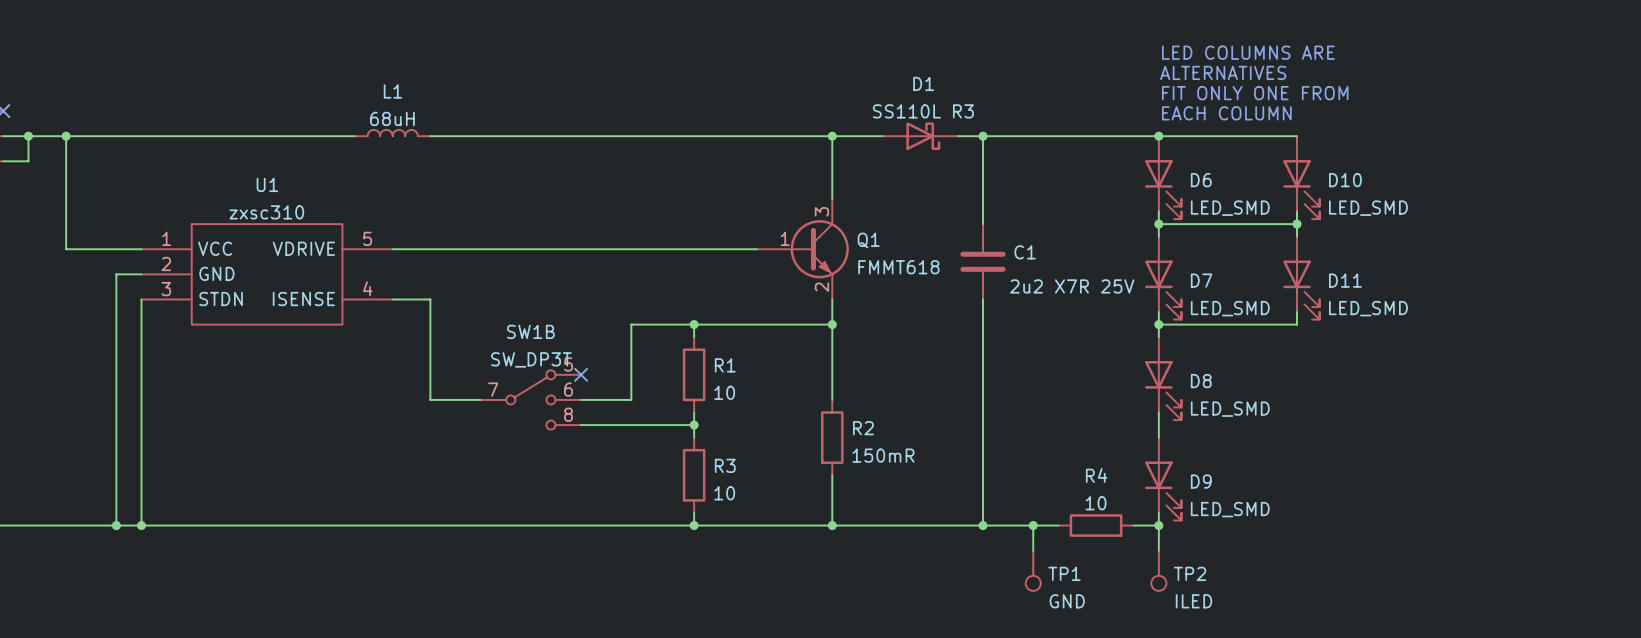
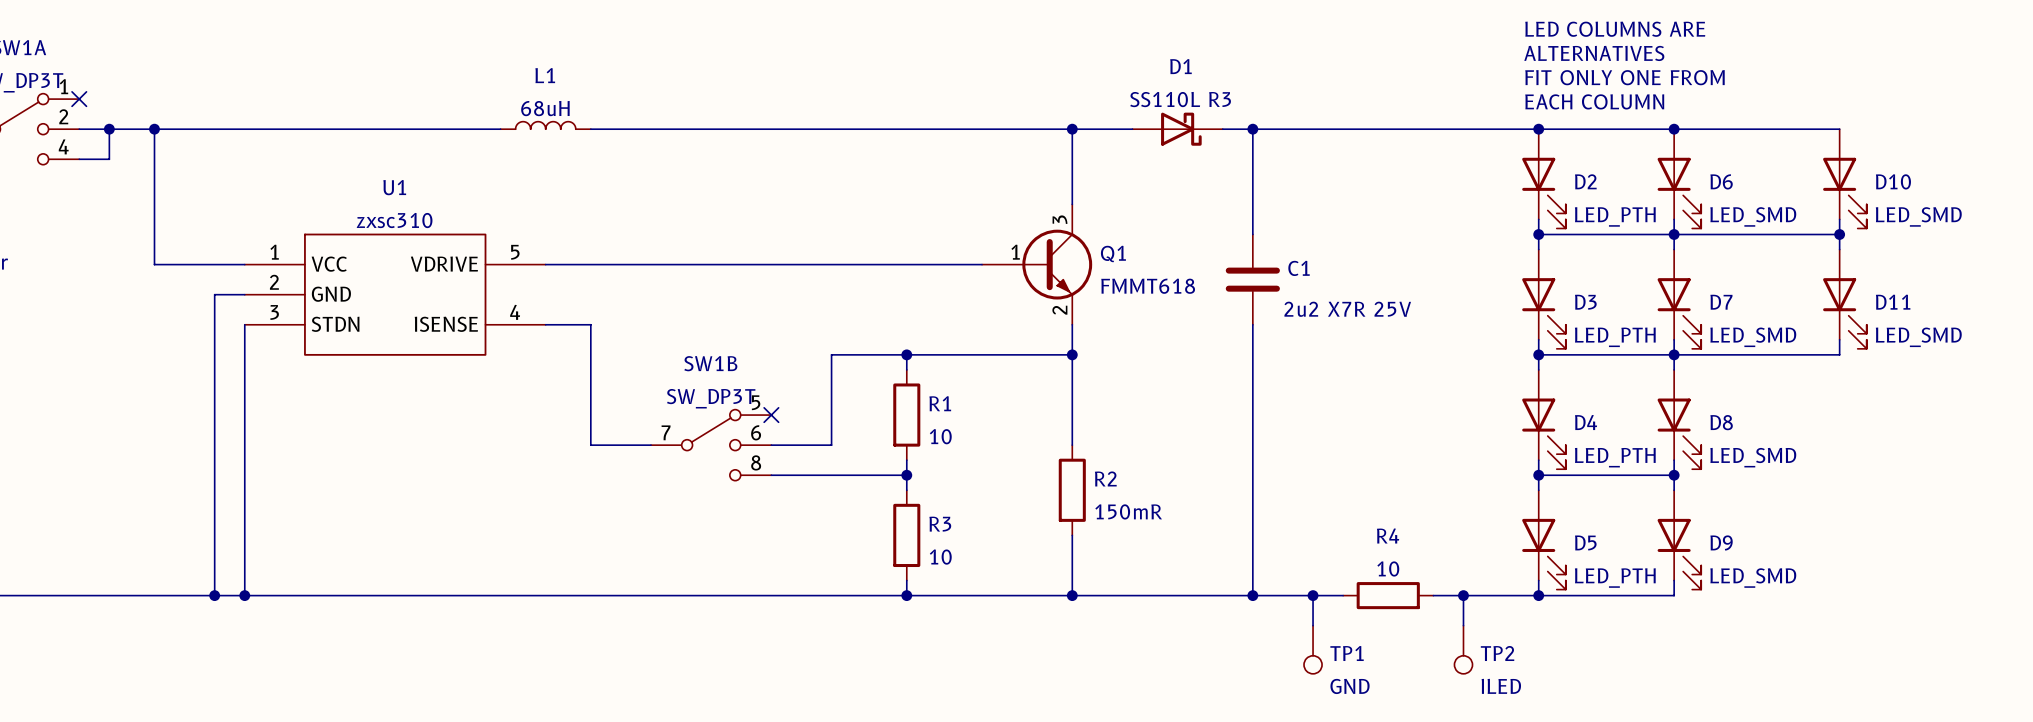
text position: LED COLUMNS ARE (1248, 52) -> LED COLUMNS ARE (1615, 29)
text position: ALTERNATIVES (1223, 72) -> ALTERNATIVES (1594, 53)
text position: FIT ONLY ONE FROM (1255, 93) -> FIT ONLY ONE FROM (1624, 77)
text position: EACH COLUMN (1226, 113) -> EACH COLUMN (1594, 101)
junction: (1158, 136) -> none
junction: none -> (1538, 129)
wire: none -> (1628, 129) (1839, 129)
junction: none -> (1674, 129)
D6 position: (1163, 177) -> (1679, 178)
D2: none -> LED_PTH (1543, 178)
D10 position: (1301, 177) -> (1844, 178)
wire: (1158, 211) (1158, 236) -> (1538, 219) (1538, 249)
wire: (1297, 211) (1297, 236) -> (1839, 219) (1839, 249)
wire: none -> (1674, 219) (1674, 249)
wire: (1158, 224) (1221, 224) -> none
junction: (1158, 224) -> none
junction: none -> (1538, 234)
wire: none -> (1628, 234) (1839, 234)
junction: (1297, 224) -> none
junction: none -> (1674, 234)
junction: none -> (1839, 234)
D7 position: (1163, 278) -> (1679, 299)
D3: none -> LED_PTH (1543, 299)
D11 position: (1301, 278) -> (1844, 299)
wire: (1158, 312) (1158, 337) -> (1538, 339) (1538, 369)
wire: (1297, 312) (1297, 324) -> (1839, 339) (1839, 354) (1628, 354)
wire: none -> (1674, 339) (1674, 369)
wire: (1158, 324) (1221, 324) -> none
junction: (1158, 324) -> none
junction: none -> (1538, 354)
junction: none -> (1674, 354)
D8 position: (1163, 378) -> (1679, 419)
D4: none -> LED_PTH (1543, 419)
wire: (1158, 412) (1158, 437) -> (1538, 460) (1538, 490)
wire: none -> (1674, 460) (1674, 490)
wire: none -> (1538, 475) (1674, 475)
junction: none -> (1538, 475)
junction: none -> (1674, 475)
D9 position: (1163, 479) -> (1679, 539)
D5: none -> LED_PTH (1543, 539)
wire: (1158, 512) (1158, 525) -> (1674, 580) (1674, 595) (1463, 595)
wire: none -> (1538, 580) (1538, 595)
junction: none -> (1538, 595)

